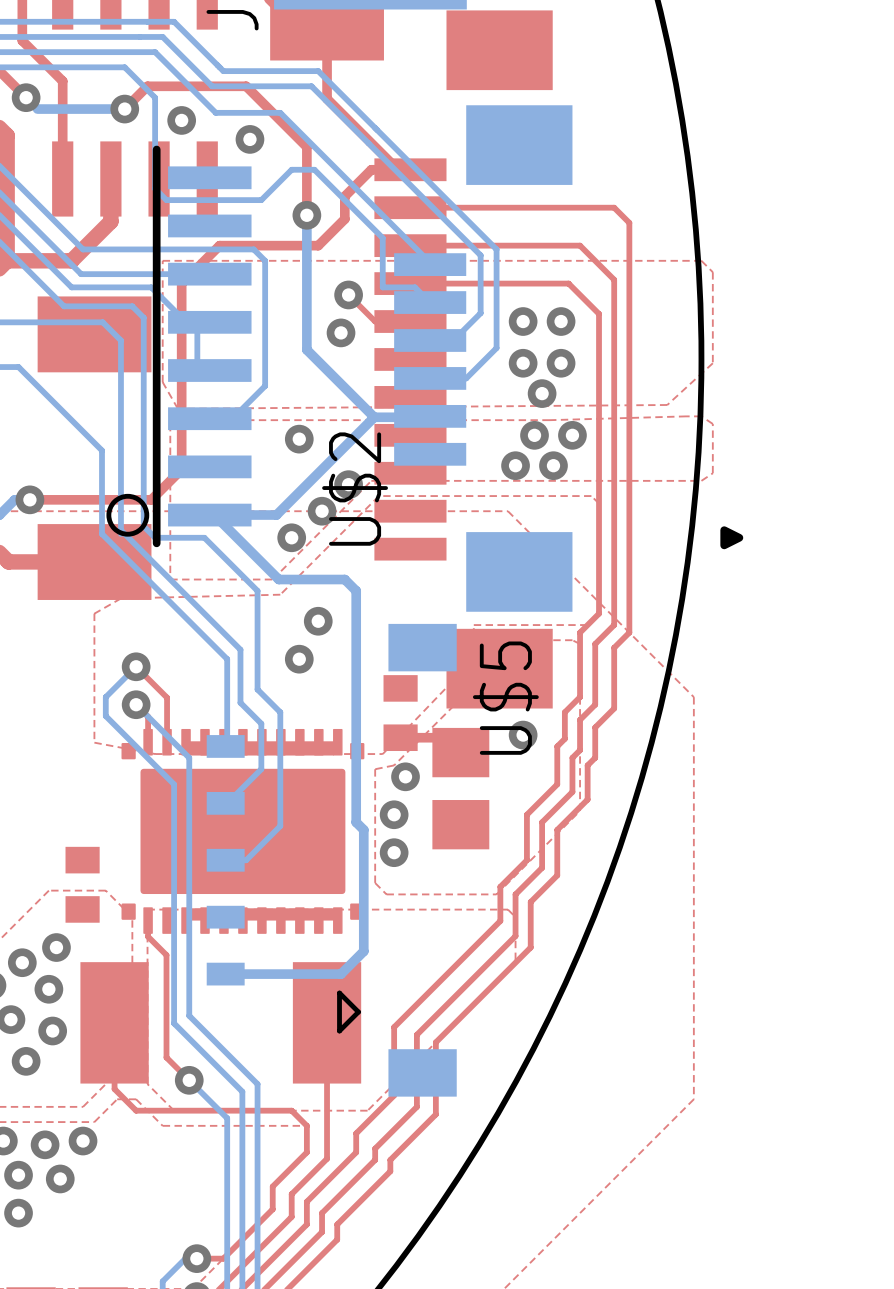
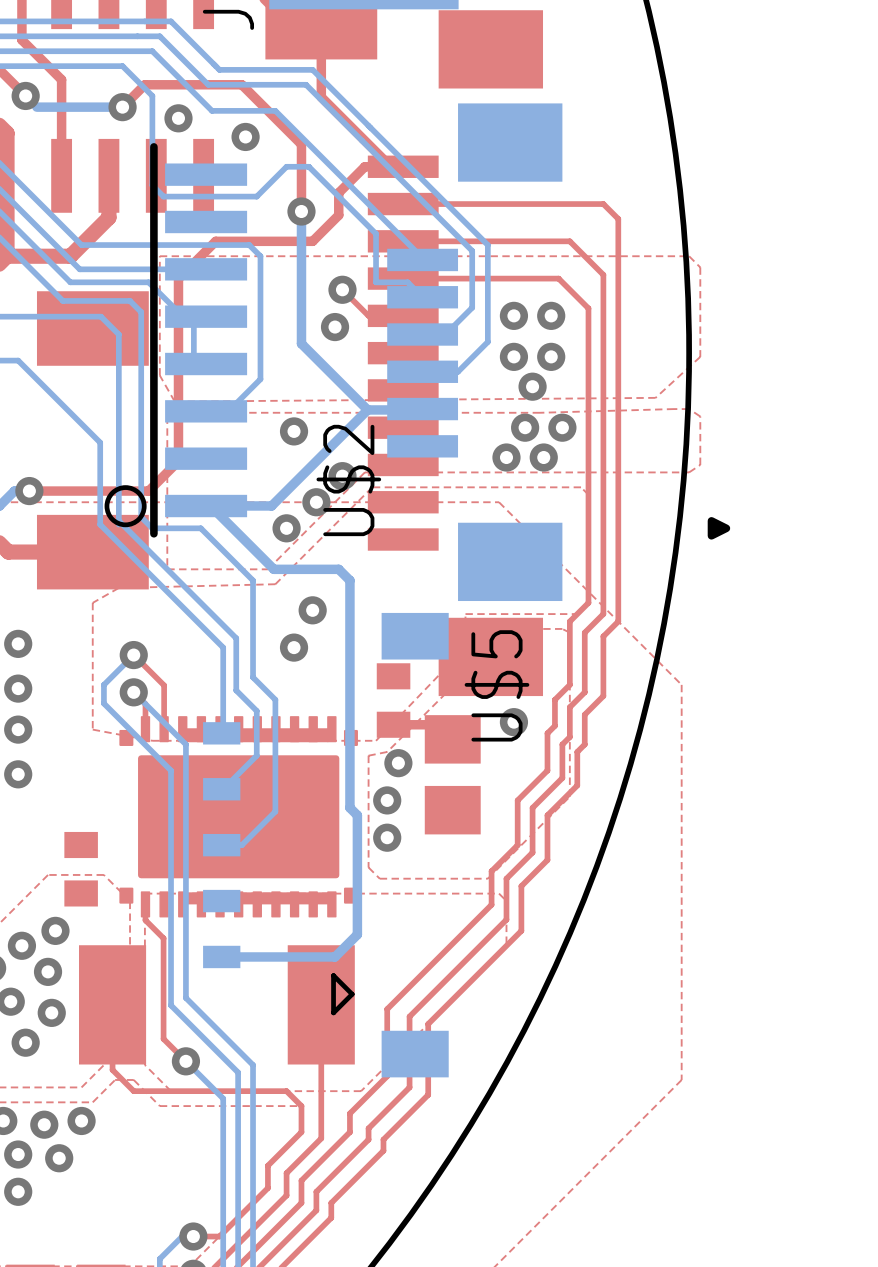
via: none -> (18, 643)
via: none -> (18, 688)
via: none -> (18, 729)
via: none -> (18, 774)

